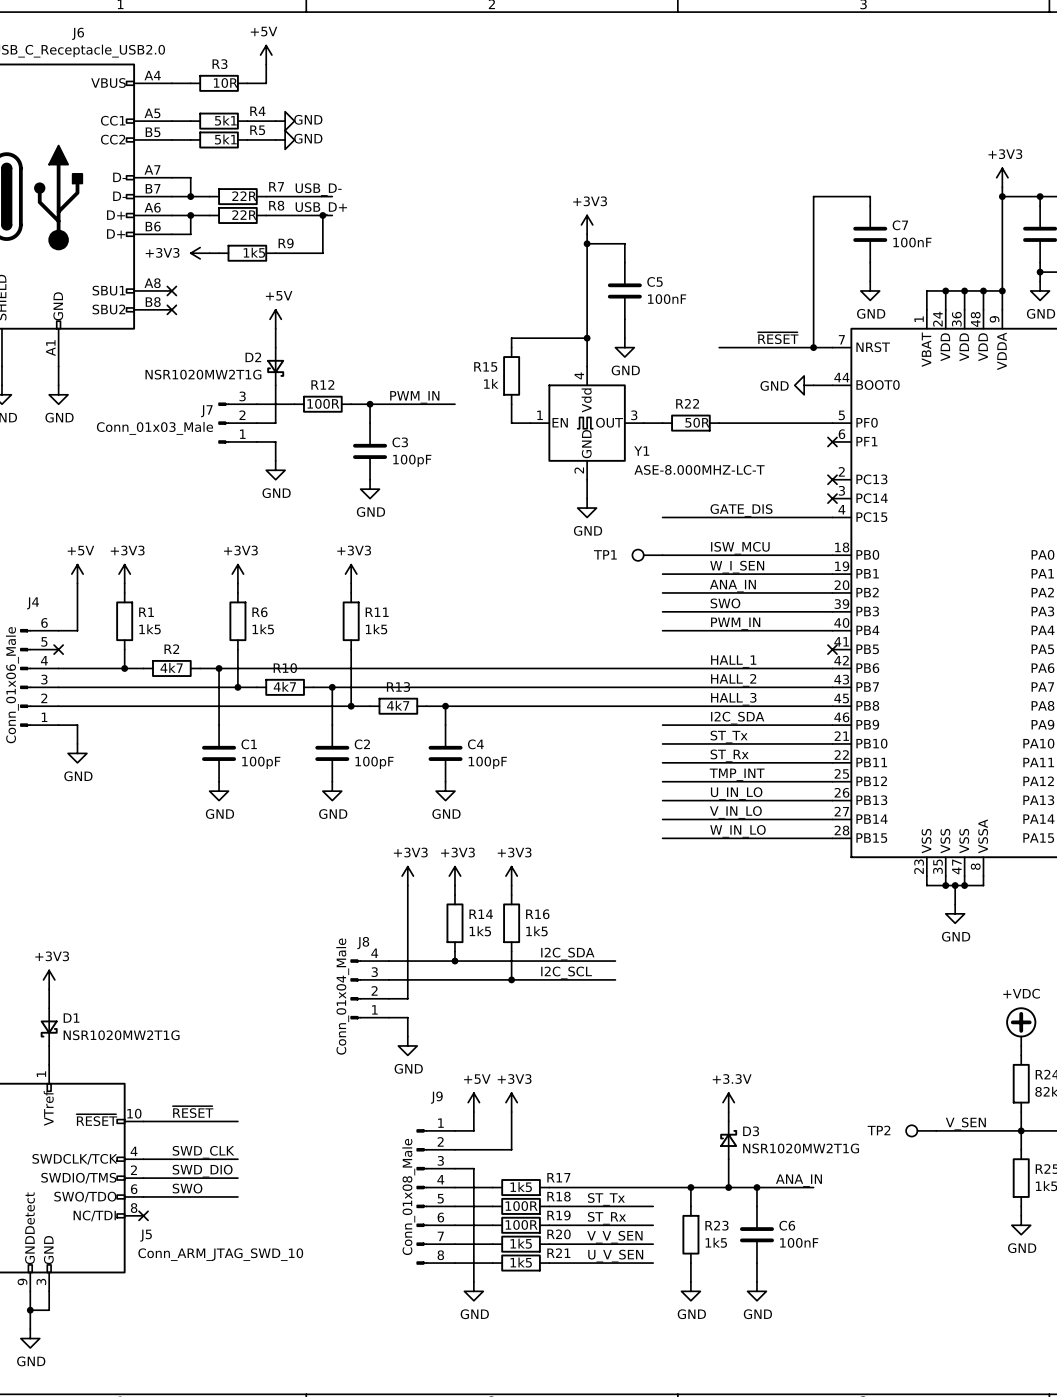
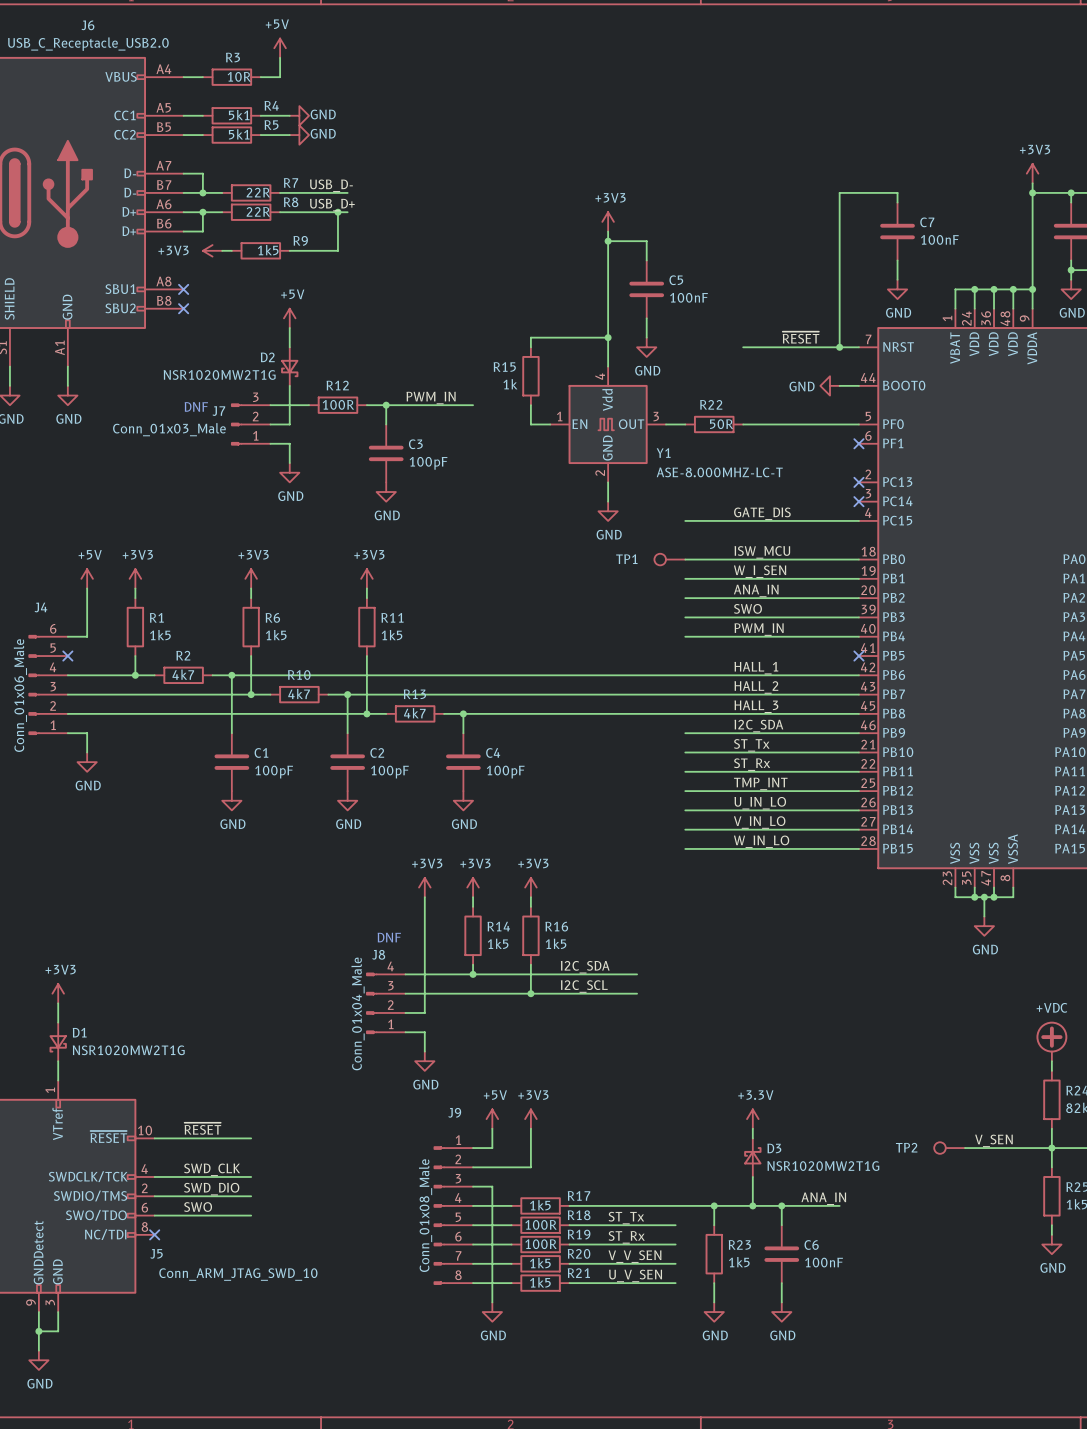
text: none -> DNF (196, 406)
text: none -> DNF (389, 937)

